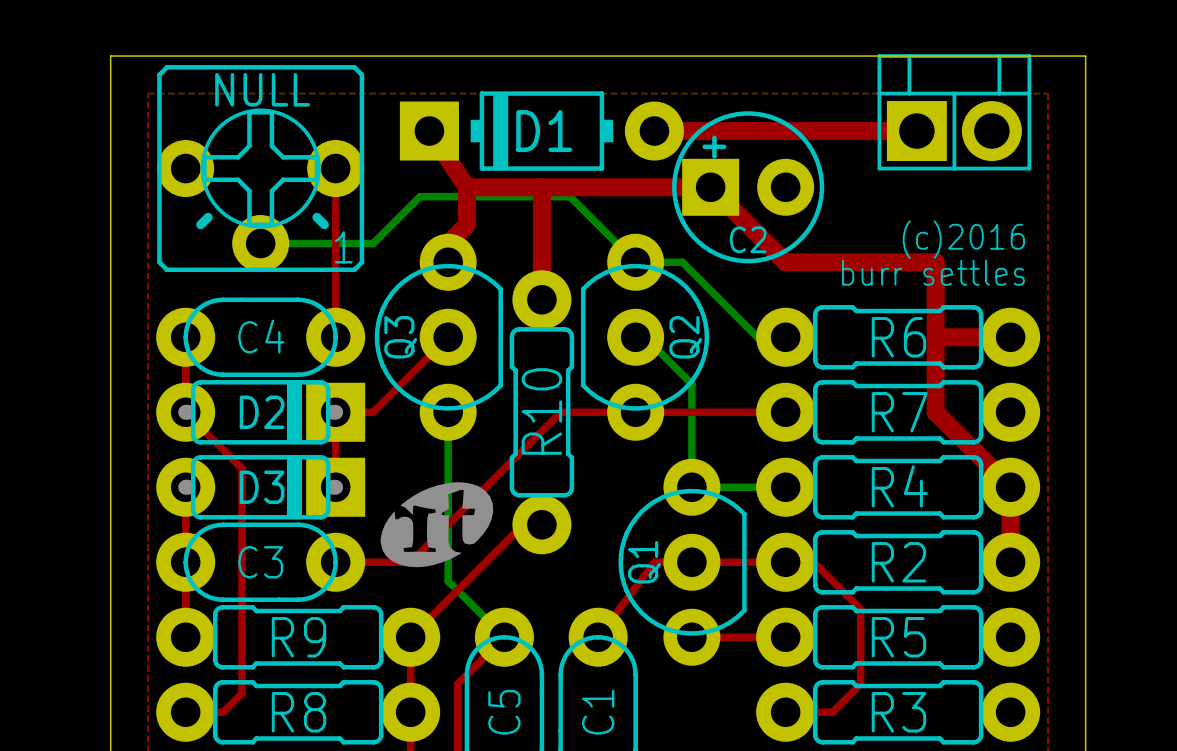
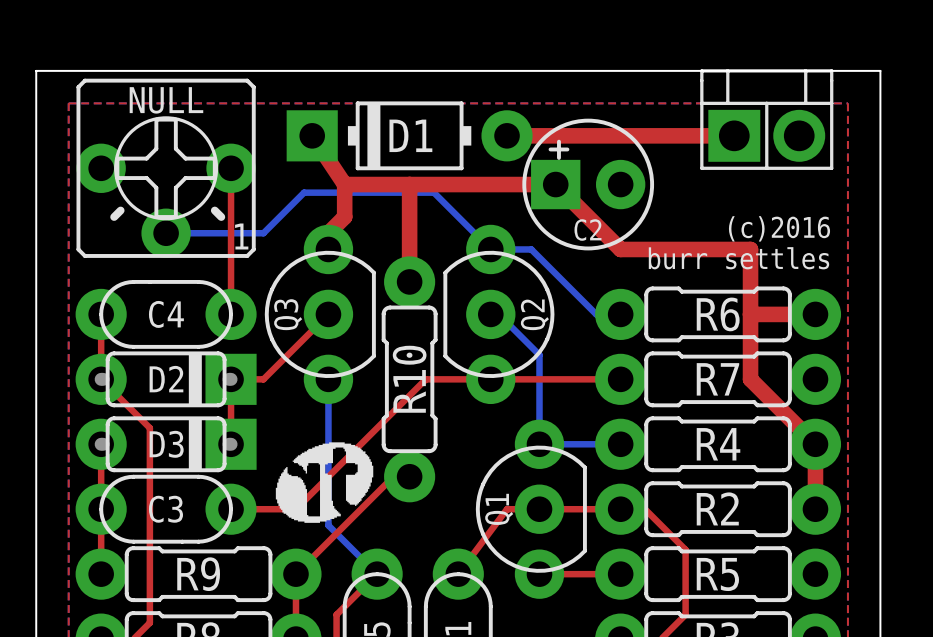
drawing shape: [380, 482, 494, 568] -> [275, 442, 374, 523]

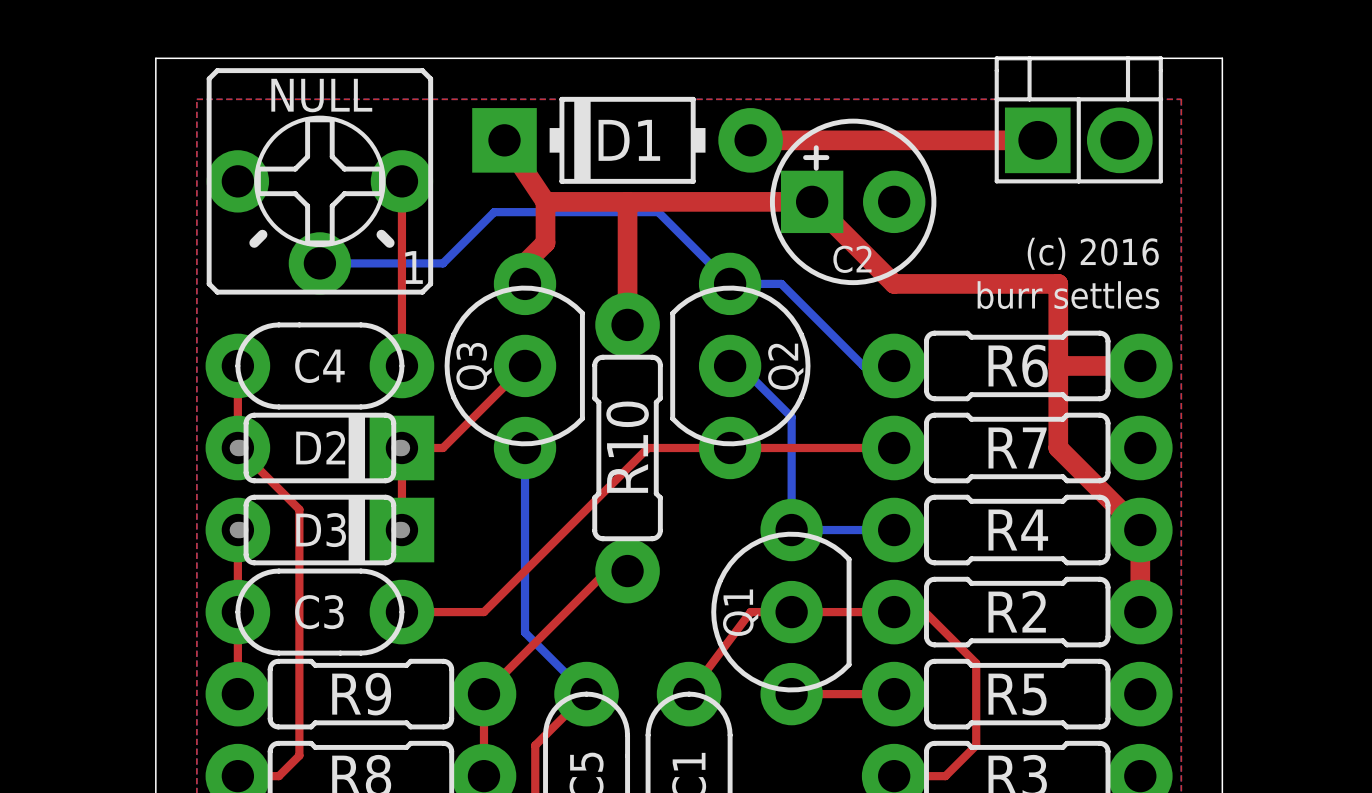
text: (c)2016 (779, 228) -> (c) 2016 (1093, 253)
drawing: [275, 442, 374, 523] -> none

